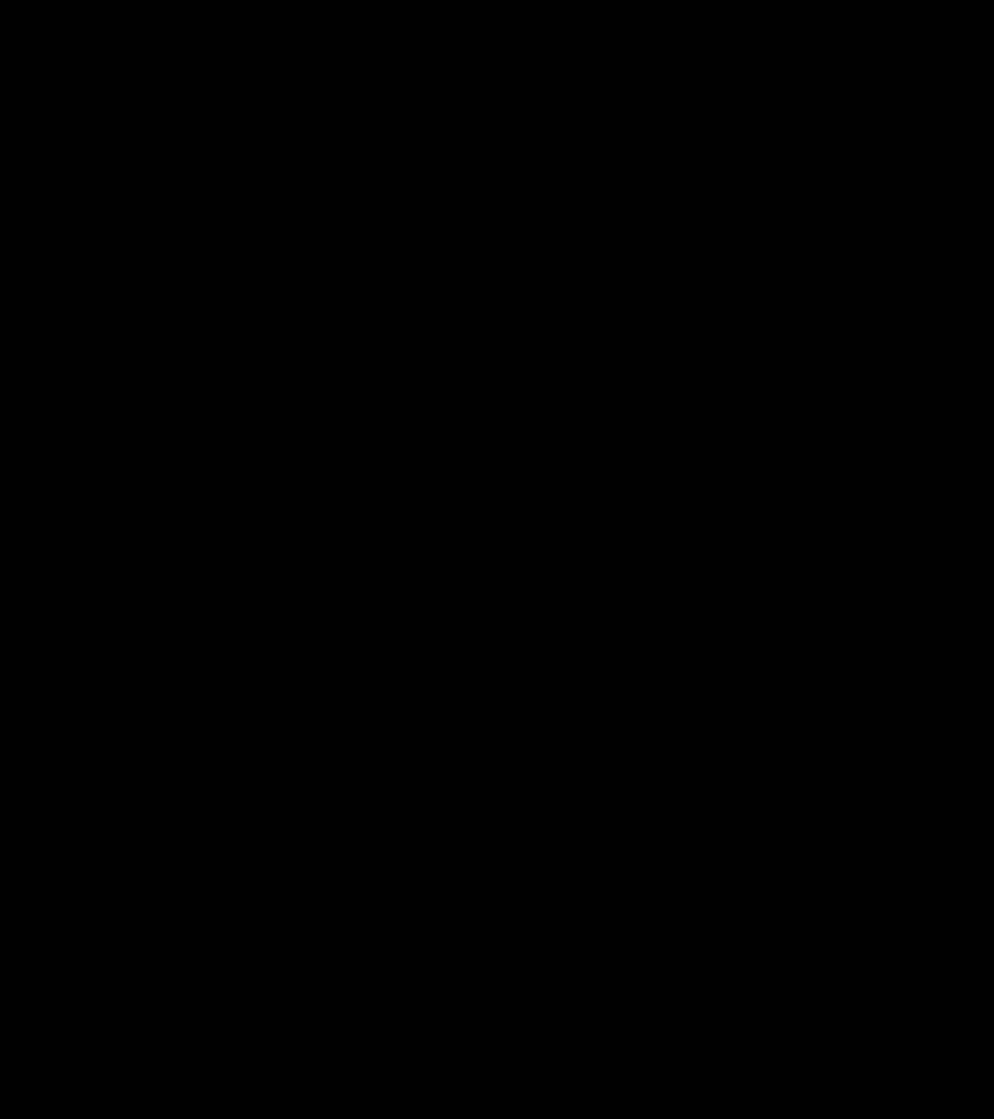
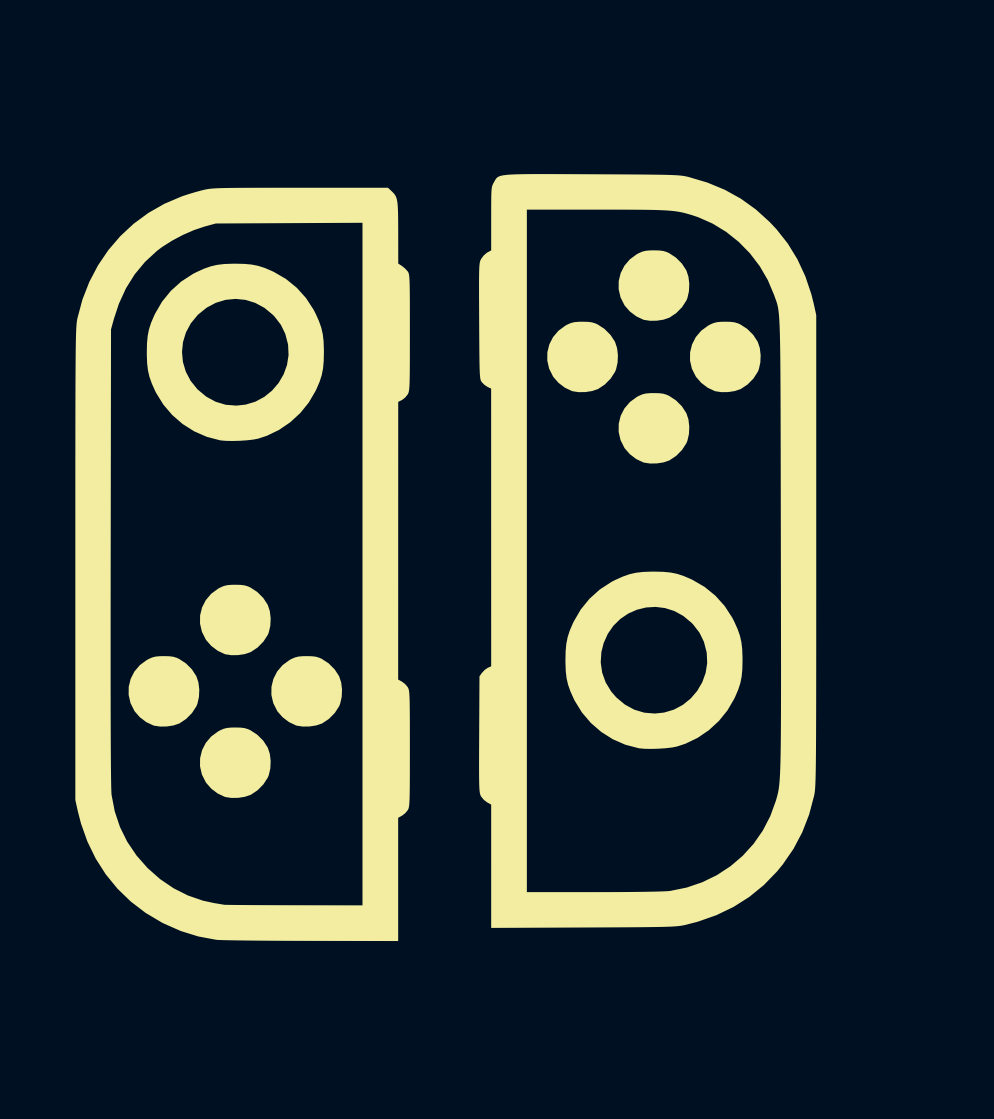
drawing: none -> [479, 174, 817, 928]
drawing: none -> [75, 187, 410, 942]

